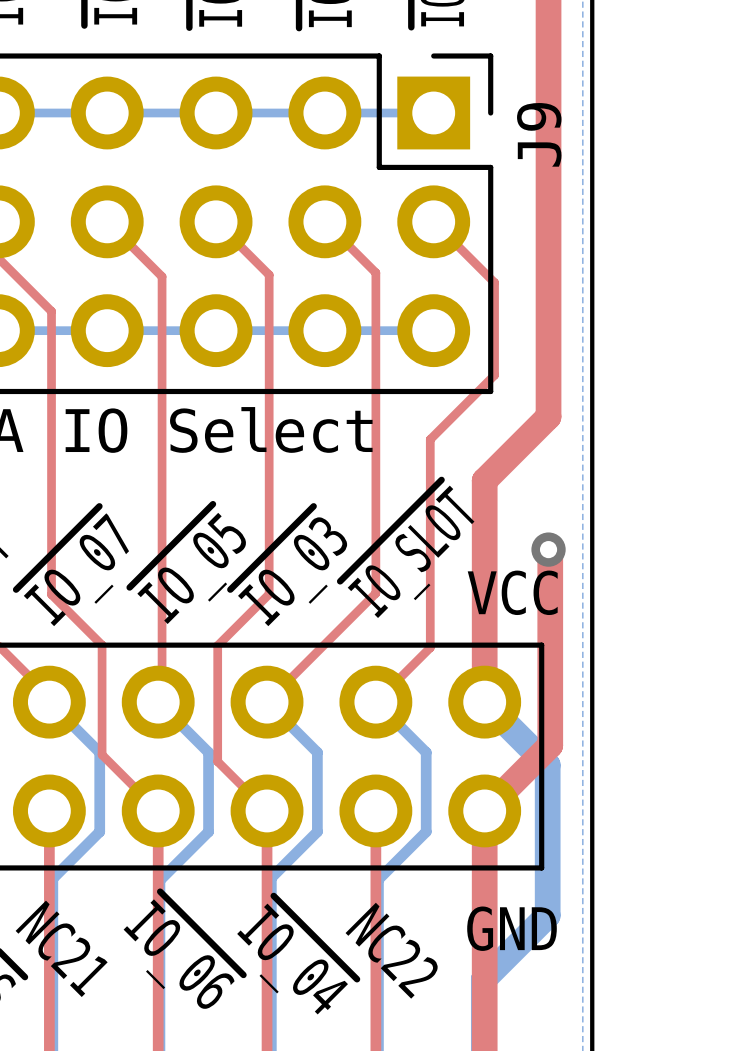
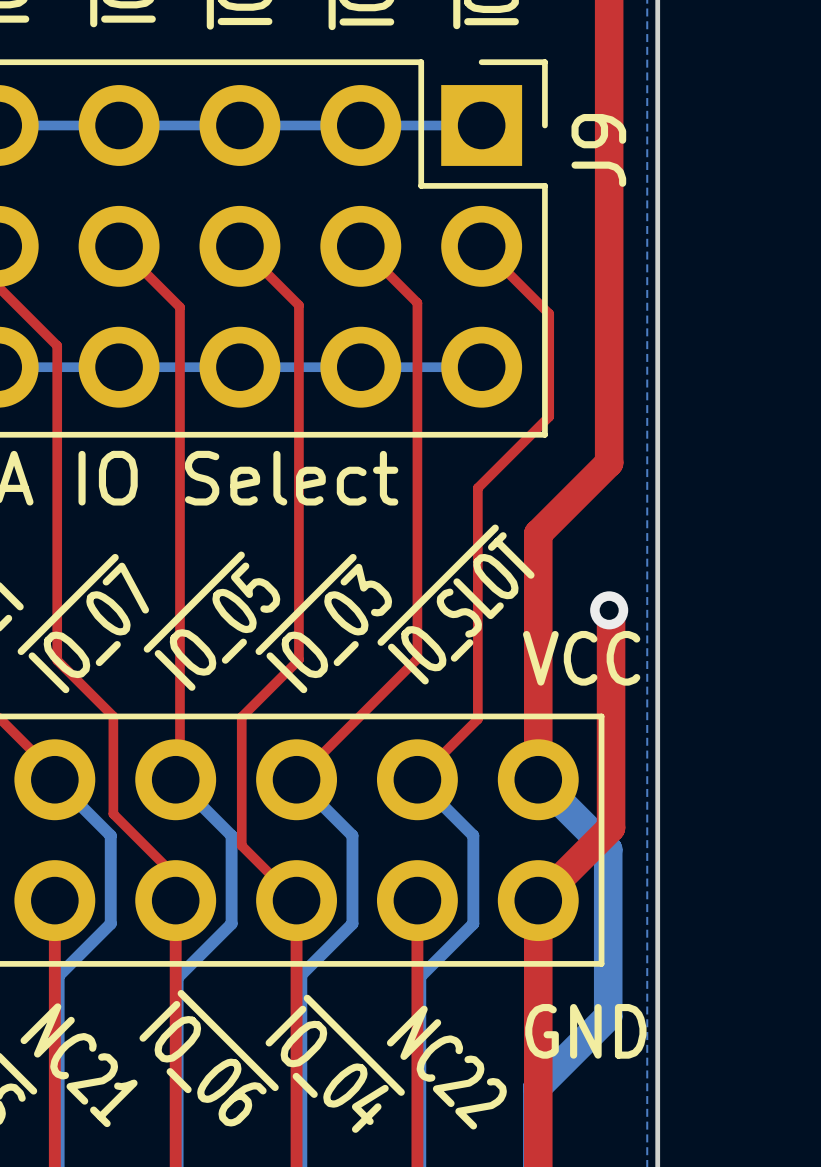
top track: (102, 732) (102, 754) (158, 810) -> (113, 814) (175, 876) (175, 900)

